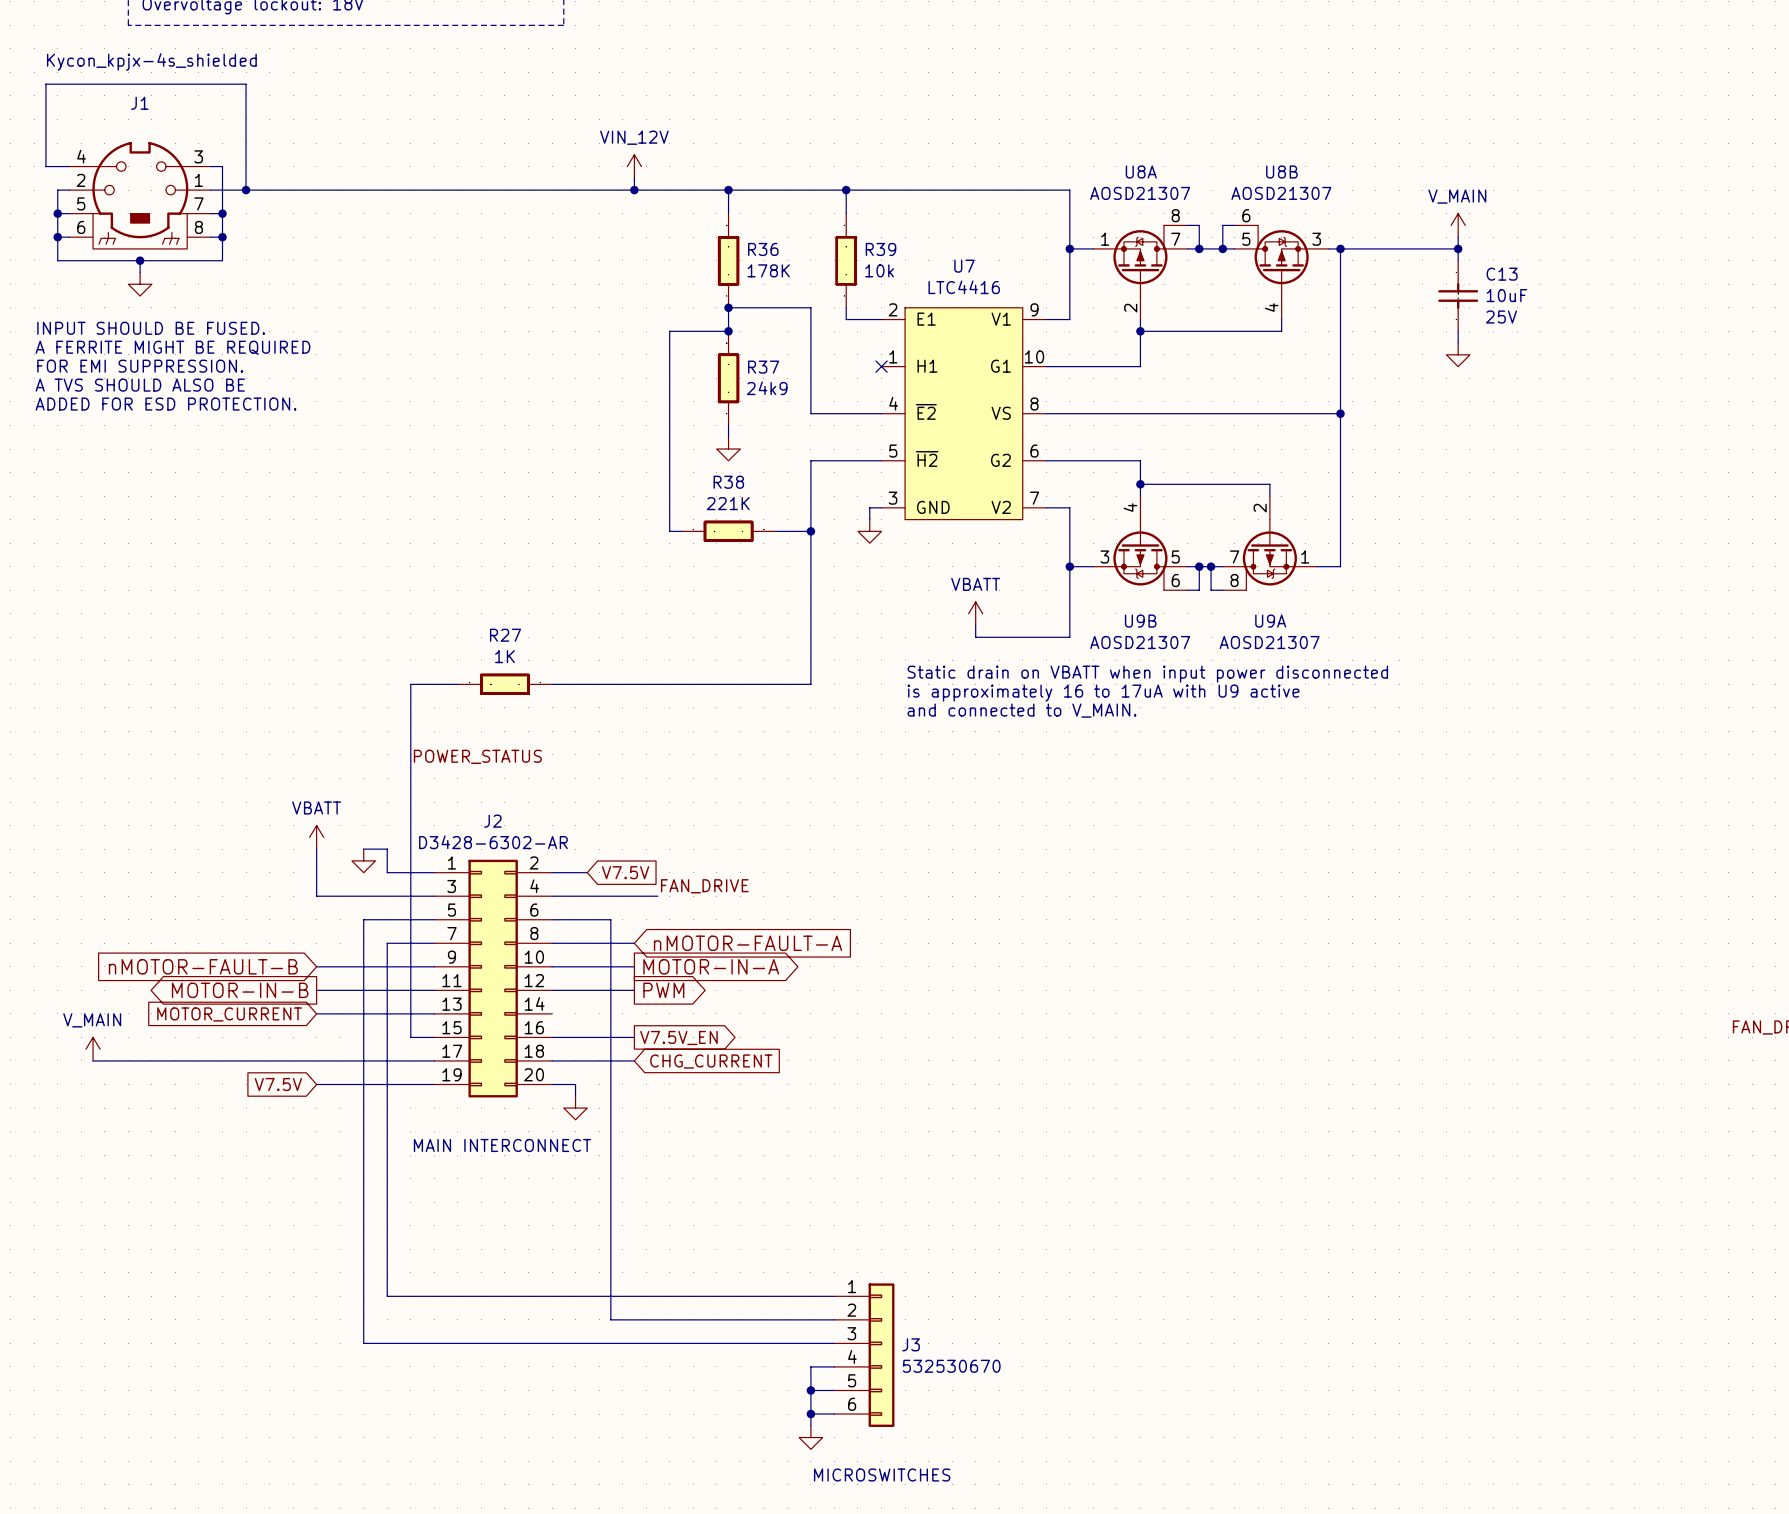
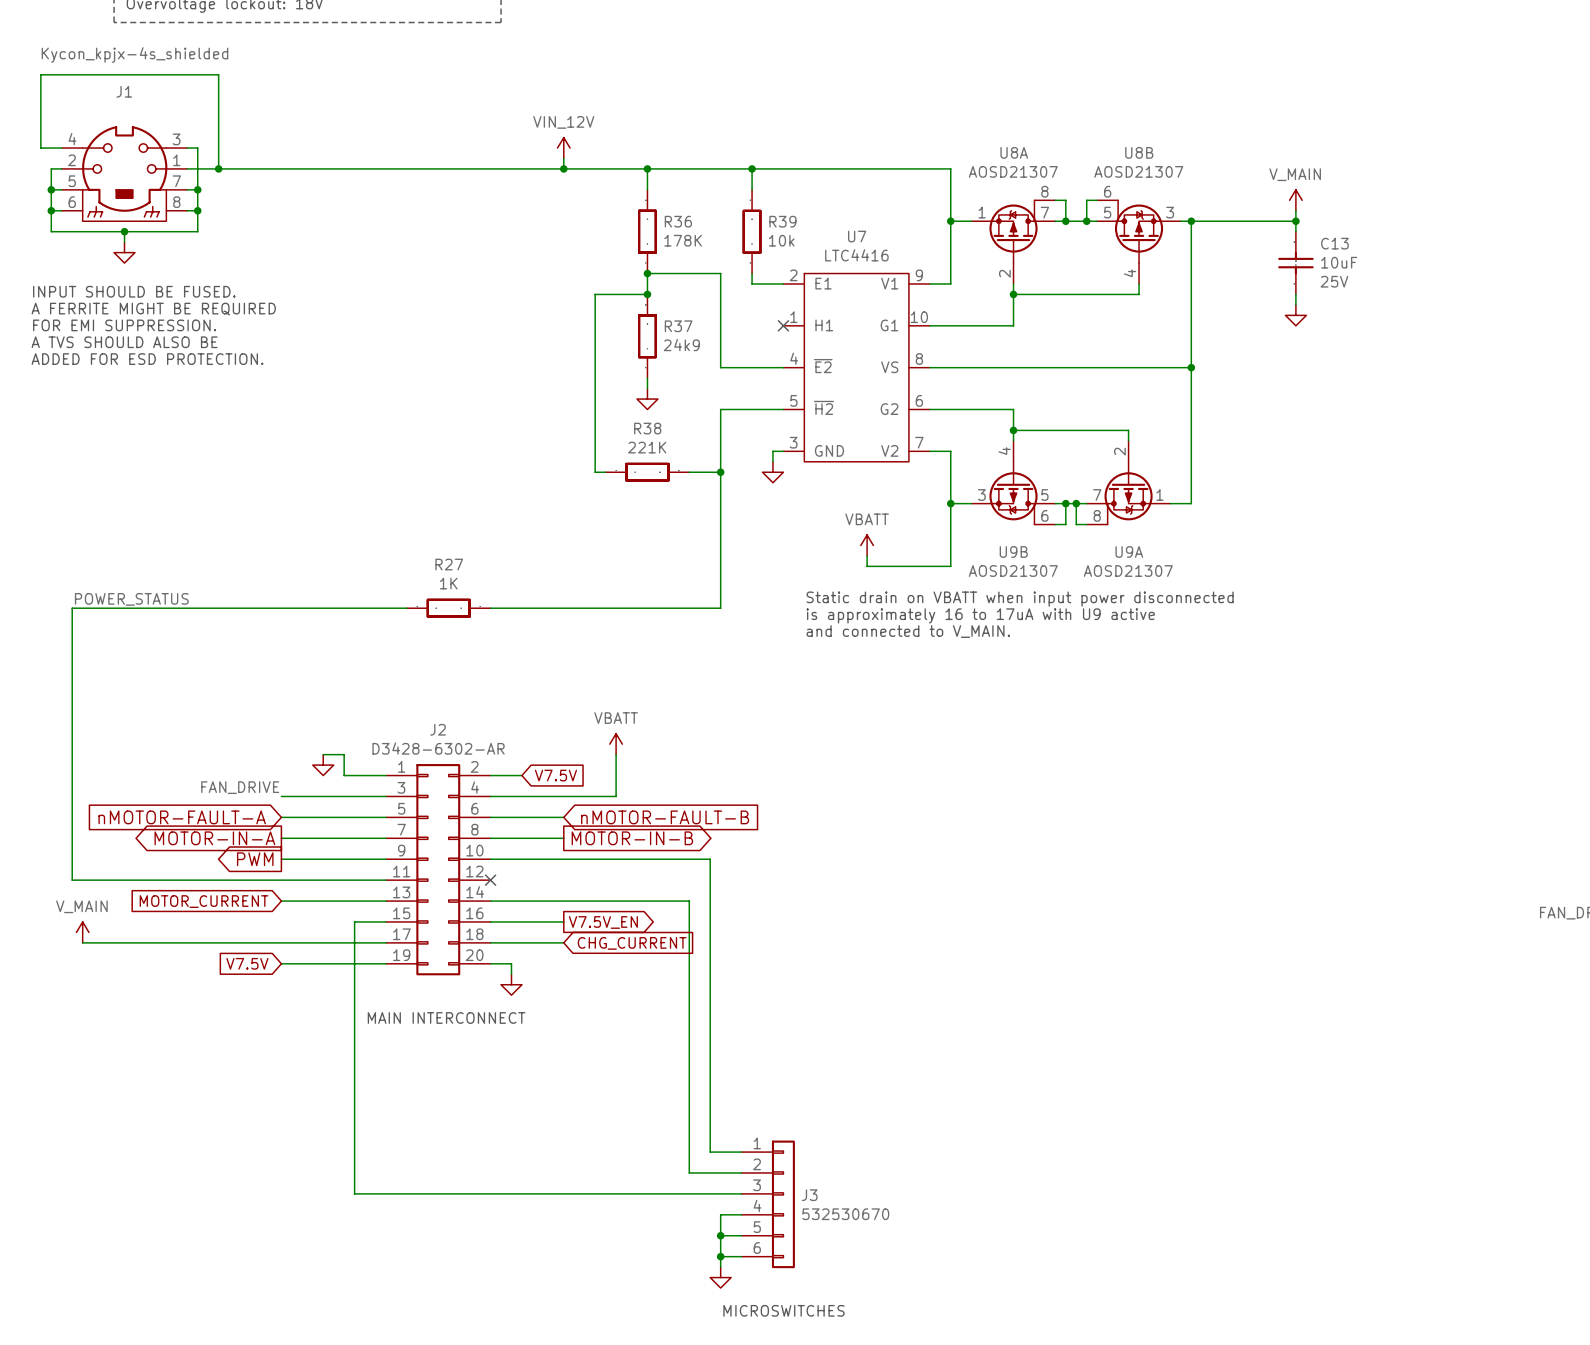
label: none -> POWER_STATUS (131, 599)
wire: (410, 684) (410, 1037) -> (365, 608) (72, 608) (72, 880) (281, 880)
label: POWER_STATUS (477, 756) -> none
power symbol: VBATT (316, 837) -> none
power symbol: none -> VBATT (616, 744)
wire: (316, 849) (316, 896) -> none
wire: none -> (616, 754) (616, 796) (584, 796)
label: none -> FAN_DRIVE (240, 787)
label: FAN_DRIVE (704, 886) -> none
global label: none -> nMOTOR-FAULT-A (182, 817)
wire: none -> (281, 817) (323, 817)
wire: (363, 919) (363, 1343) (399, 1343) -> (365, 921) (354, 921) (354, 1193)
wire: (610, 919) (610, 1319) (775, 1319) -> (490, 901) (689, 901) (689, 1172)
wire: none -> (542, 817) (563, 817)
global label: none -> nMOTOR-FAULT-B (665, 817)
global label: none -> MOTOR-IN-A (214, 838)
wire: none -> (281, 838) (344, 838)
wire: (387, 943) (387, 1296) (799, 1296) -> (563, 859) (710, 859) (710, 1152)
global label shape: input (748, 943) -> output (632, 838)
global label: nMOTOR-FAULT-A (748, 943) -> MOTOR-IN-B (632, 838)
global label shape: input (203, 966) -> output (255, 859)
global label: nMOTOR-FAULT-B (203, 966) -> PWM (255, 859)
global label: MOTOR-IN-A (711, 966) -> none
global label: MOTOR-IN-B (240, 990) -> none
wire: (552, 990) (634, 990) -> none
no-connect mark: none -> (490, 880)
global label: PWM (663, 990) -> none

